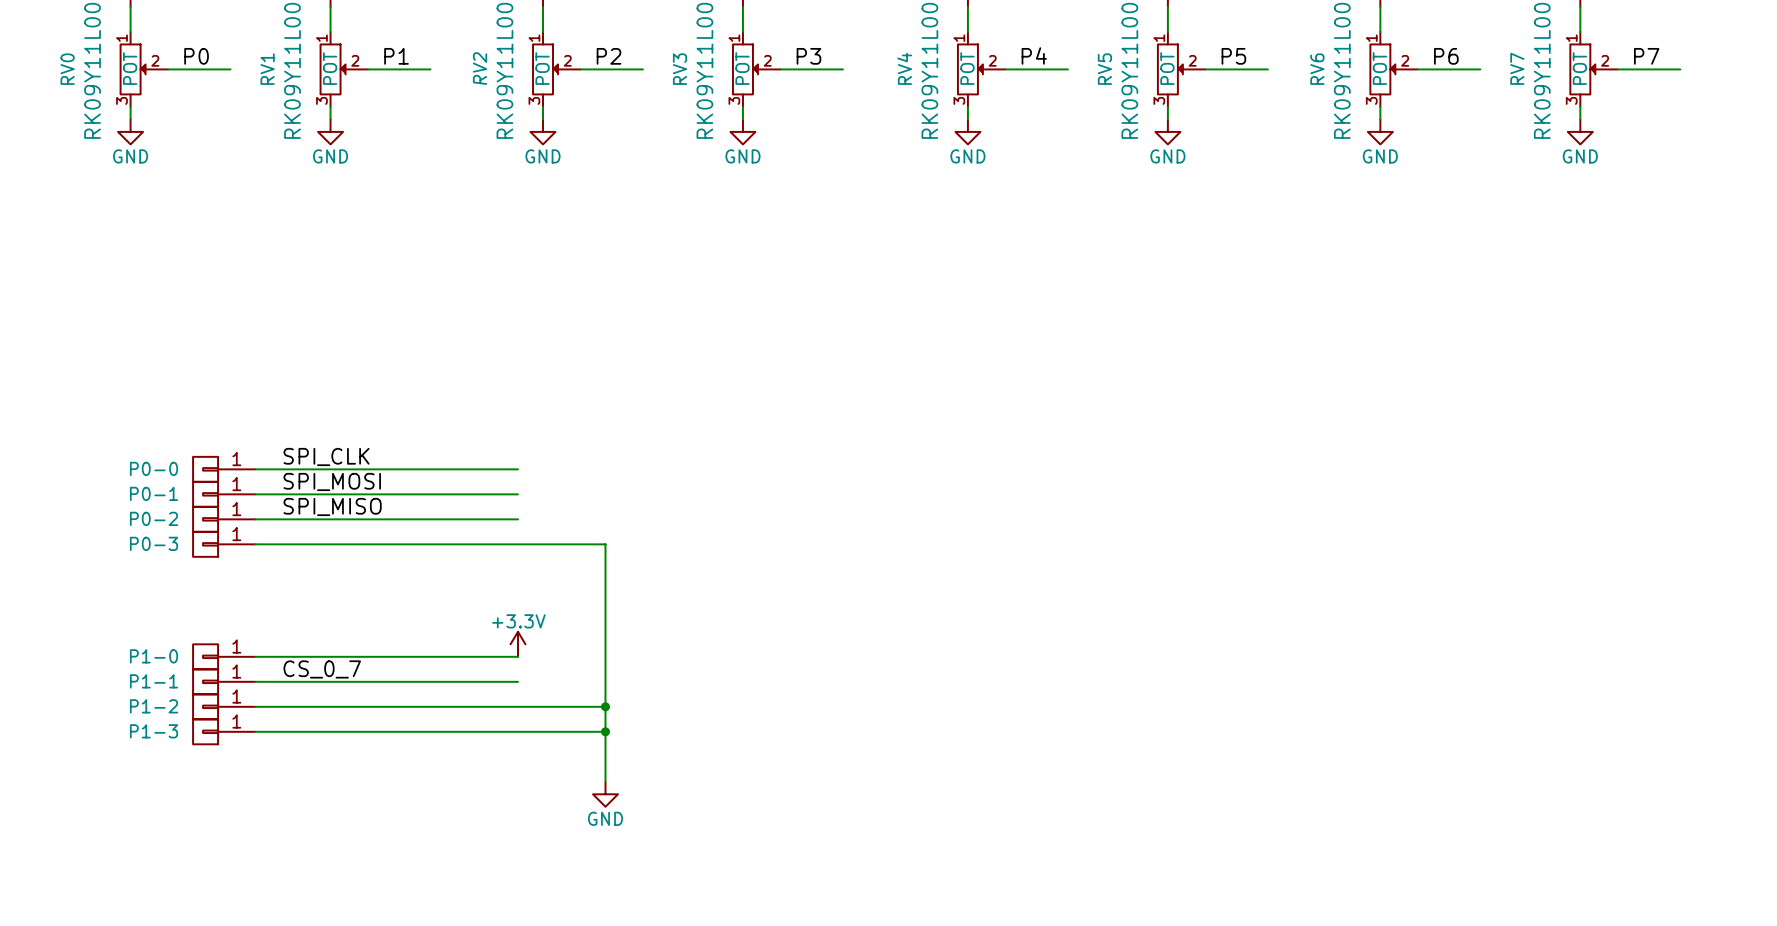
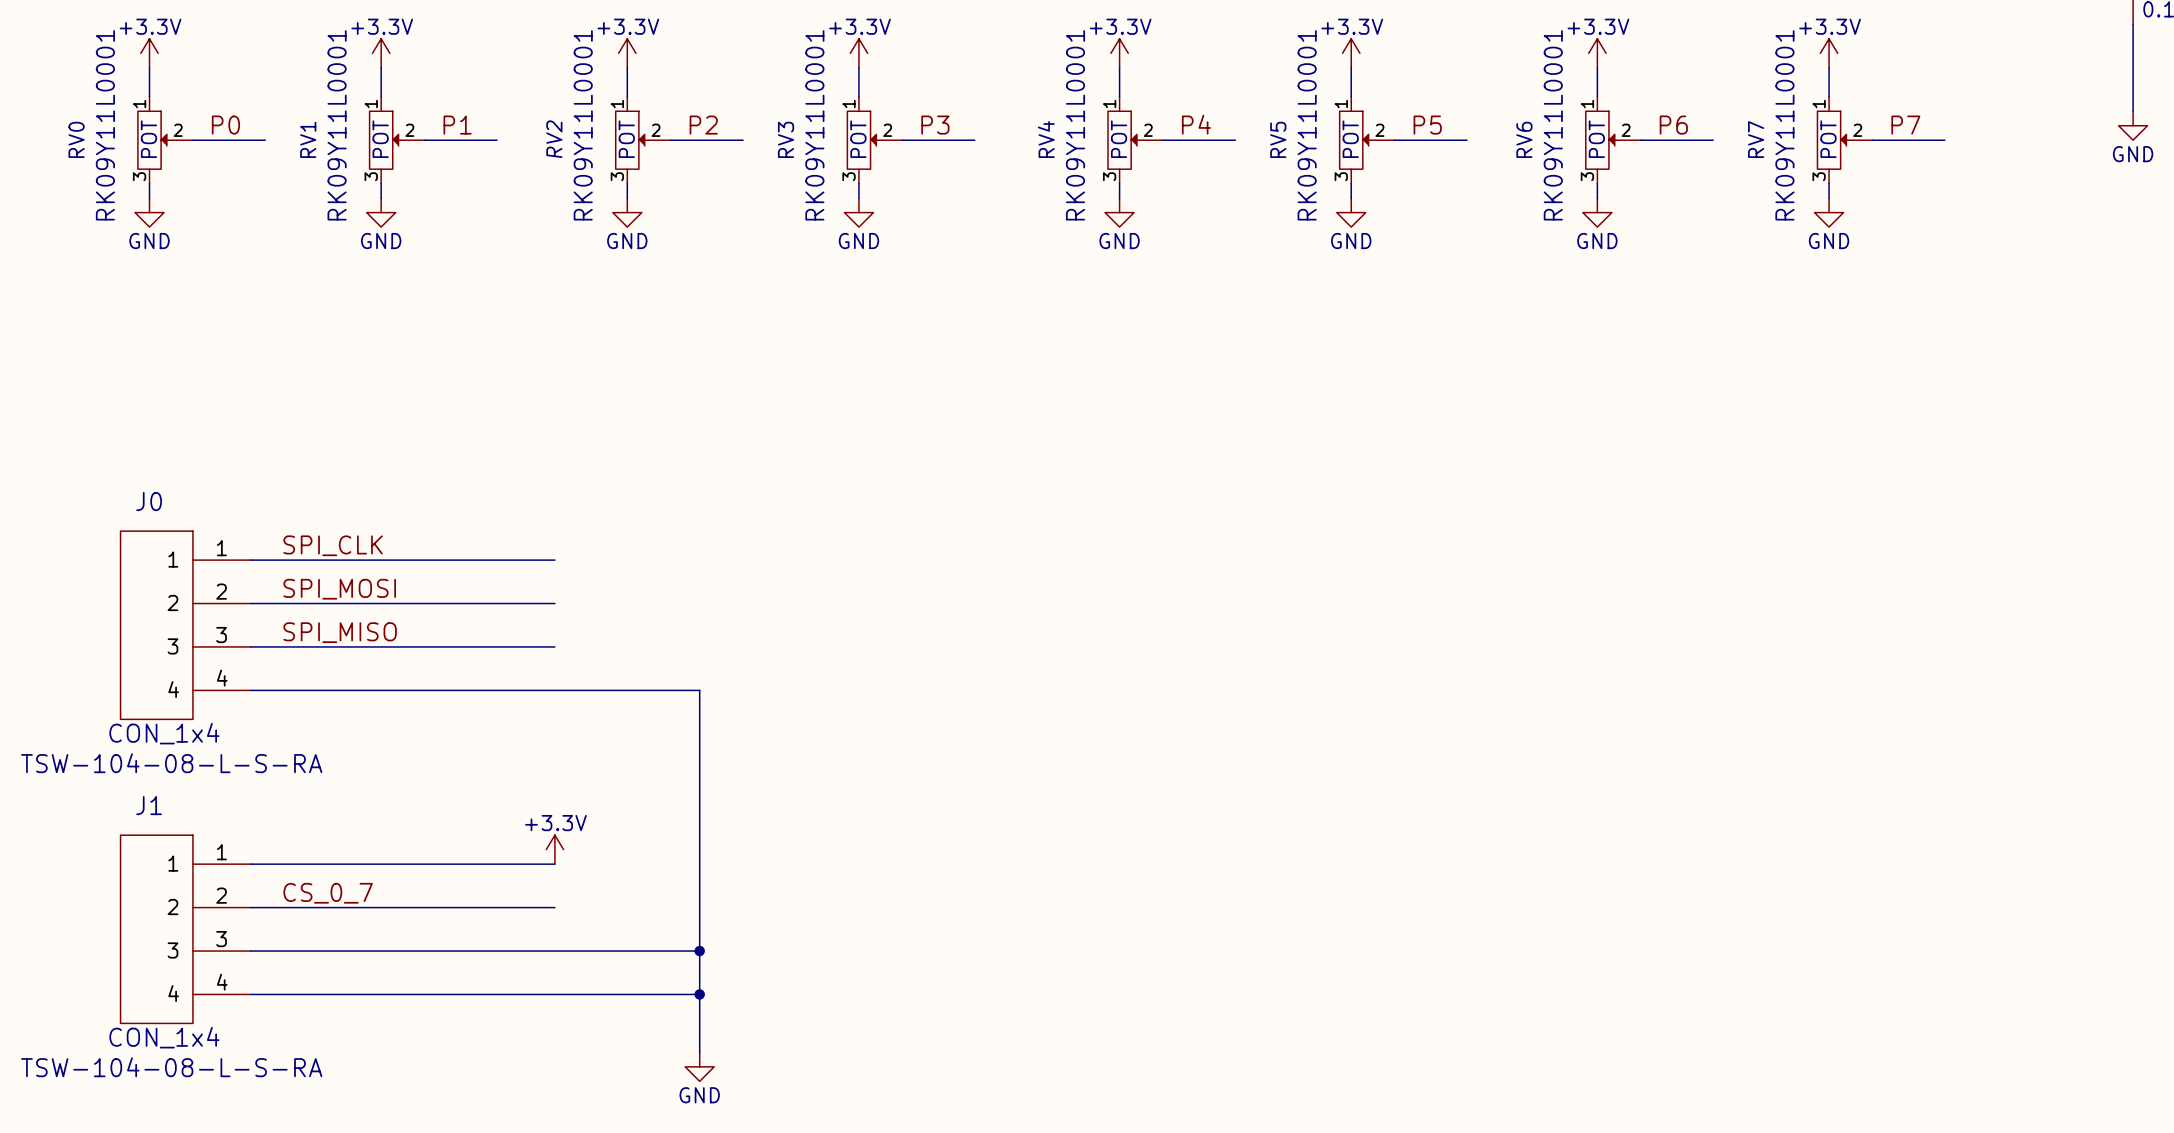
label position: SPI_CLK (326, 456) -> SPI_CLK (333, 545)
P0-0: (224, 469) -> none
wire: (480, 469) (518, 469) -> none
label position: SPI_MOSI (332, 481) -> SPI_MOSI (339, 589)
J0: none -> CON_1x4 (185, 625)
P0-1: (224, 494) -> none
wire: (255, 494) (518, 494) -> (250, 646) (554, 646)
label position: SPI_MISO (332, 506) -> SPI_MISO (340, 632)
P0-2: (224, 519) -> none
wire: (255, 519) (518, 519) -> (250, 560) (554, 560)
P0-3: (224, 544) -> none
text: none -> TSW-104-08-L-S-RA (171, 763)
power symbol position: +3.3V (518, 644) -> +3.3V (554, 849)
P1-0: (224, 656) -> none
wire: (255, 656) (518, 656) -> none
label position: CS_0_7 (322, 669) -> CS_0_7 (328, 893)
P1-1: (224, 681) -> none
wire: (255, 681) (518, 681) -> (250, 864) (554, 864)
P1-2: (224, 706) -> none
wire: (255, 706) (605, 706) -> none
junction: (605, 706) -> none
P1-3: (224, 731) -> none
wire: (480, 731) (605, 731) -> none
junction: (605, 731) -> none
J1: none -> CON_1x4 (185, 929)
wire: none -> (250, 951) (699, 951)
junction: none -> (699, 951)
wire: none -> (699, 965) (699, 1052)
power symbol position: GND (605, 794) -> GND (699, 1066)
wire: none -> (250, 994) (699, 994)
junction: none -> (699, 994)
text: none -> TSW-104-08-L-S-RA (171, 1067)

